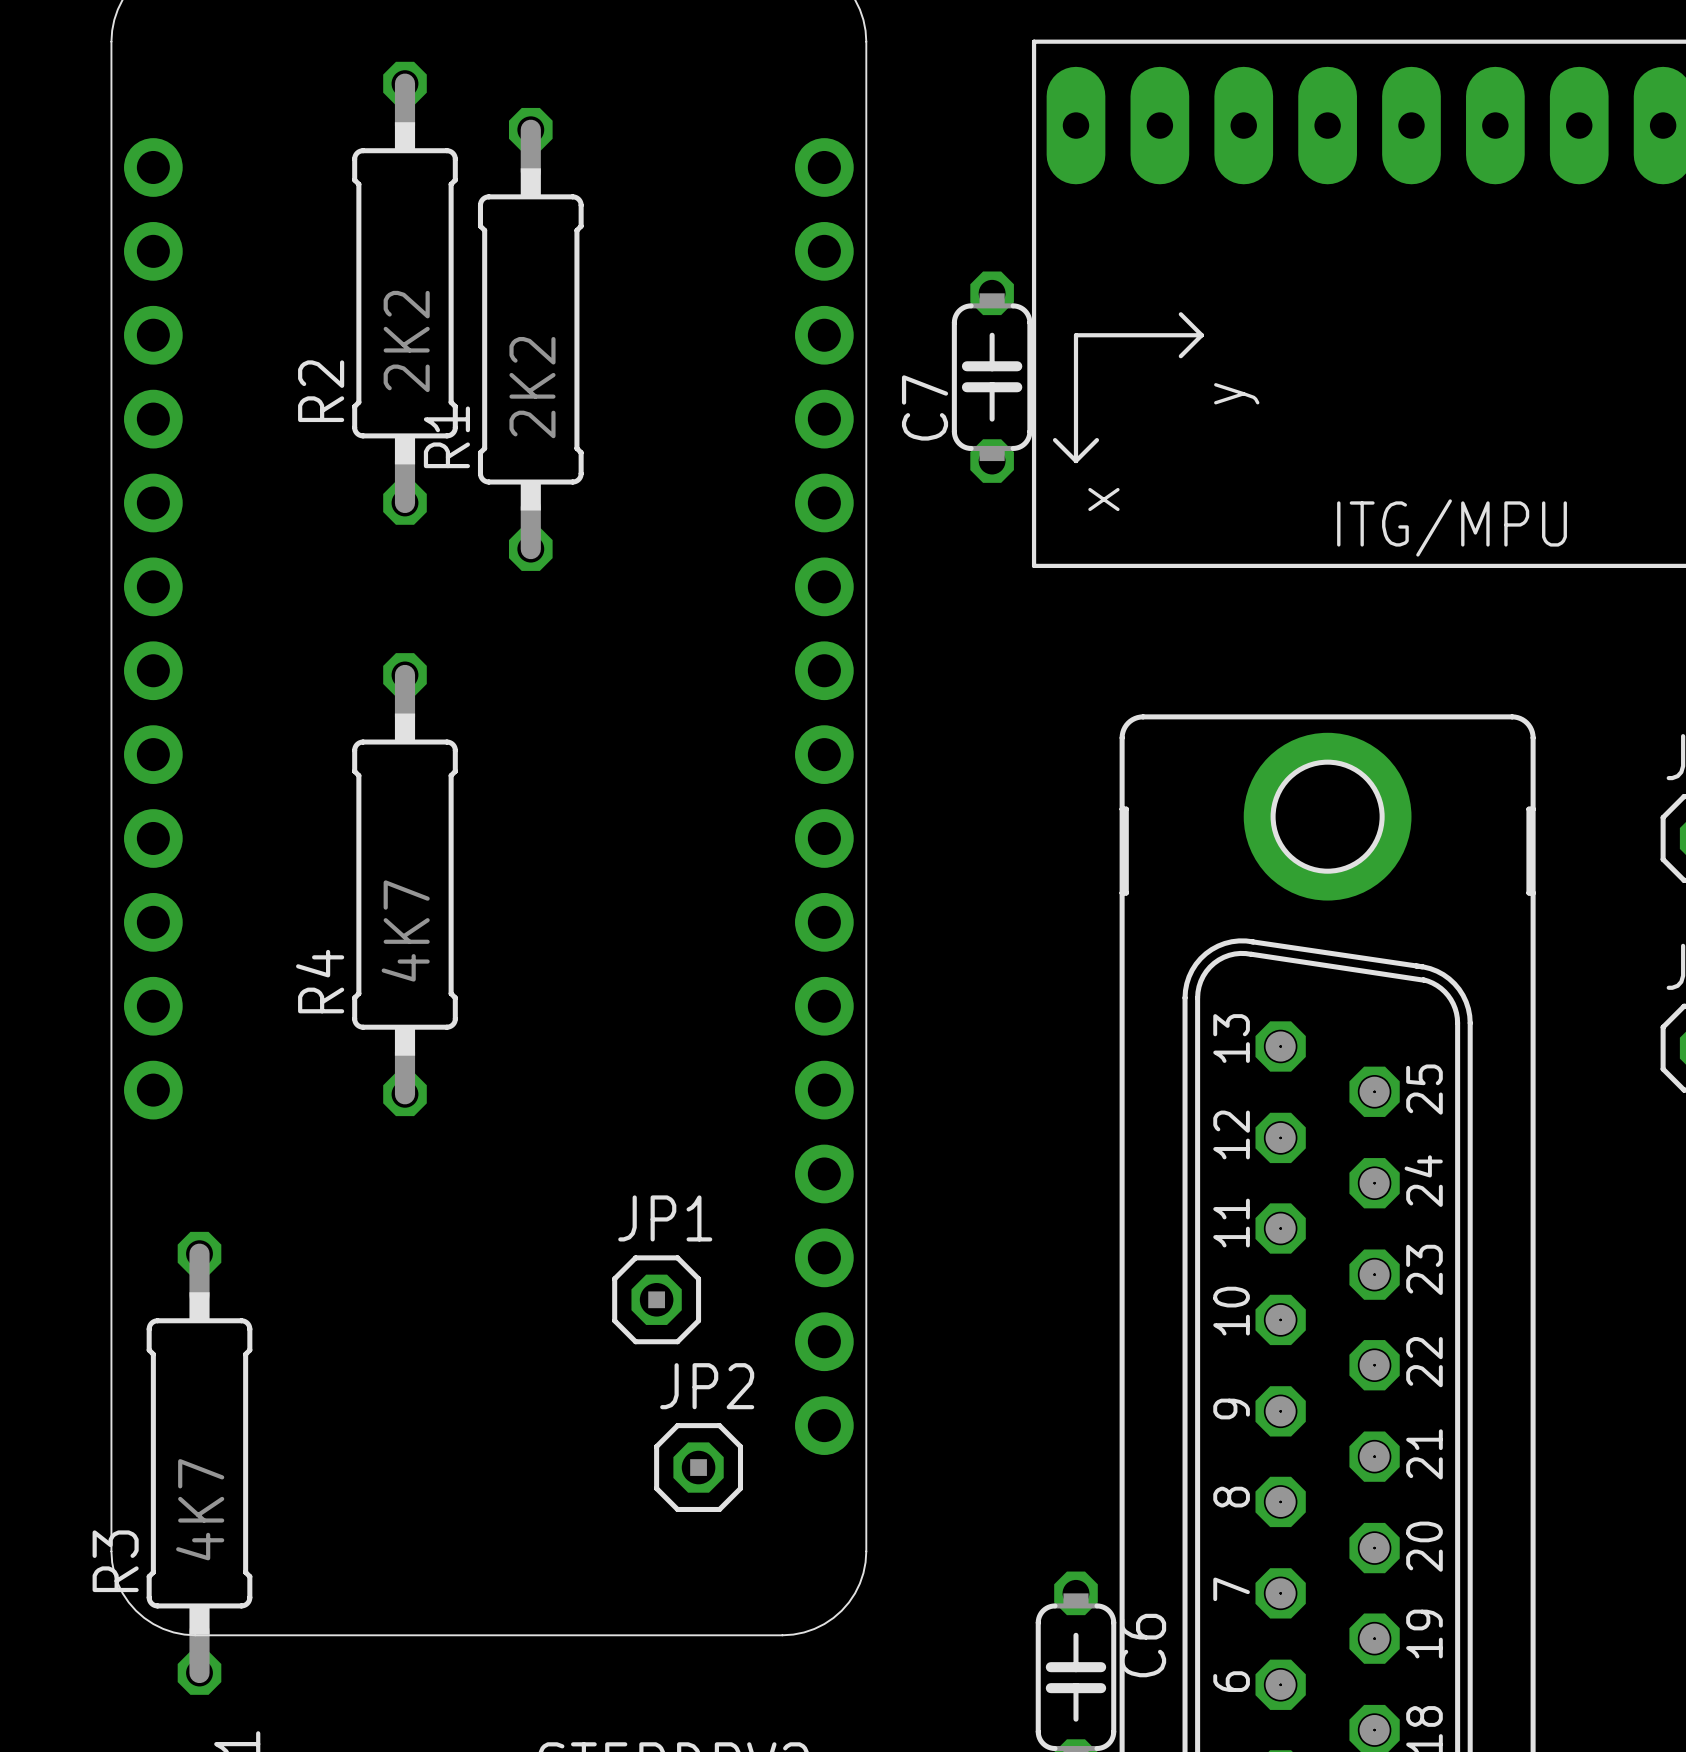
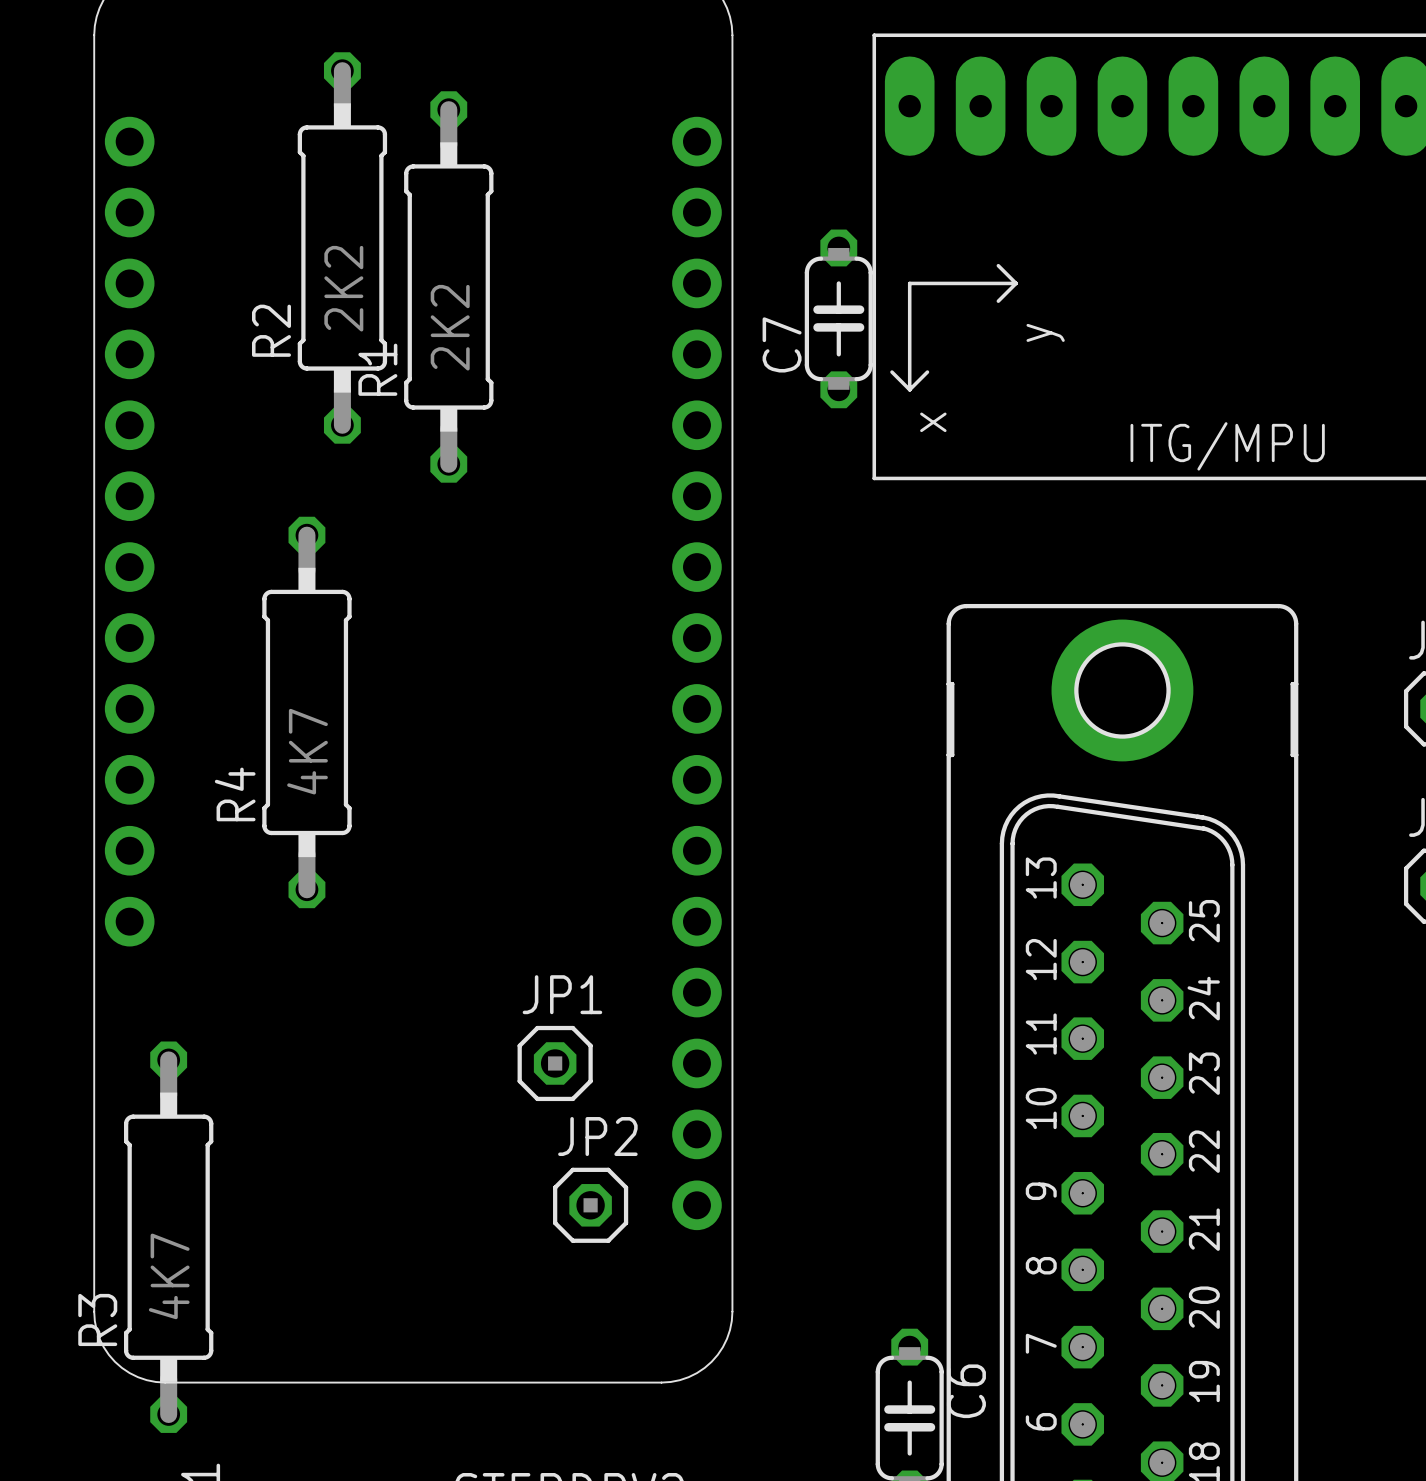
R4 position: (404, 884) -> (306, 712)
JP1 position: (656, 1299) -> (555, 1063)
JP2 position: (698, 1467) -> (590, 1205)

